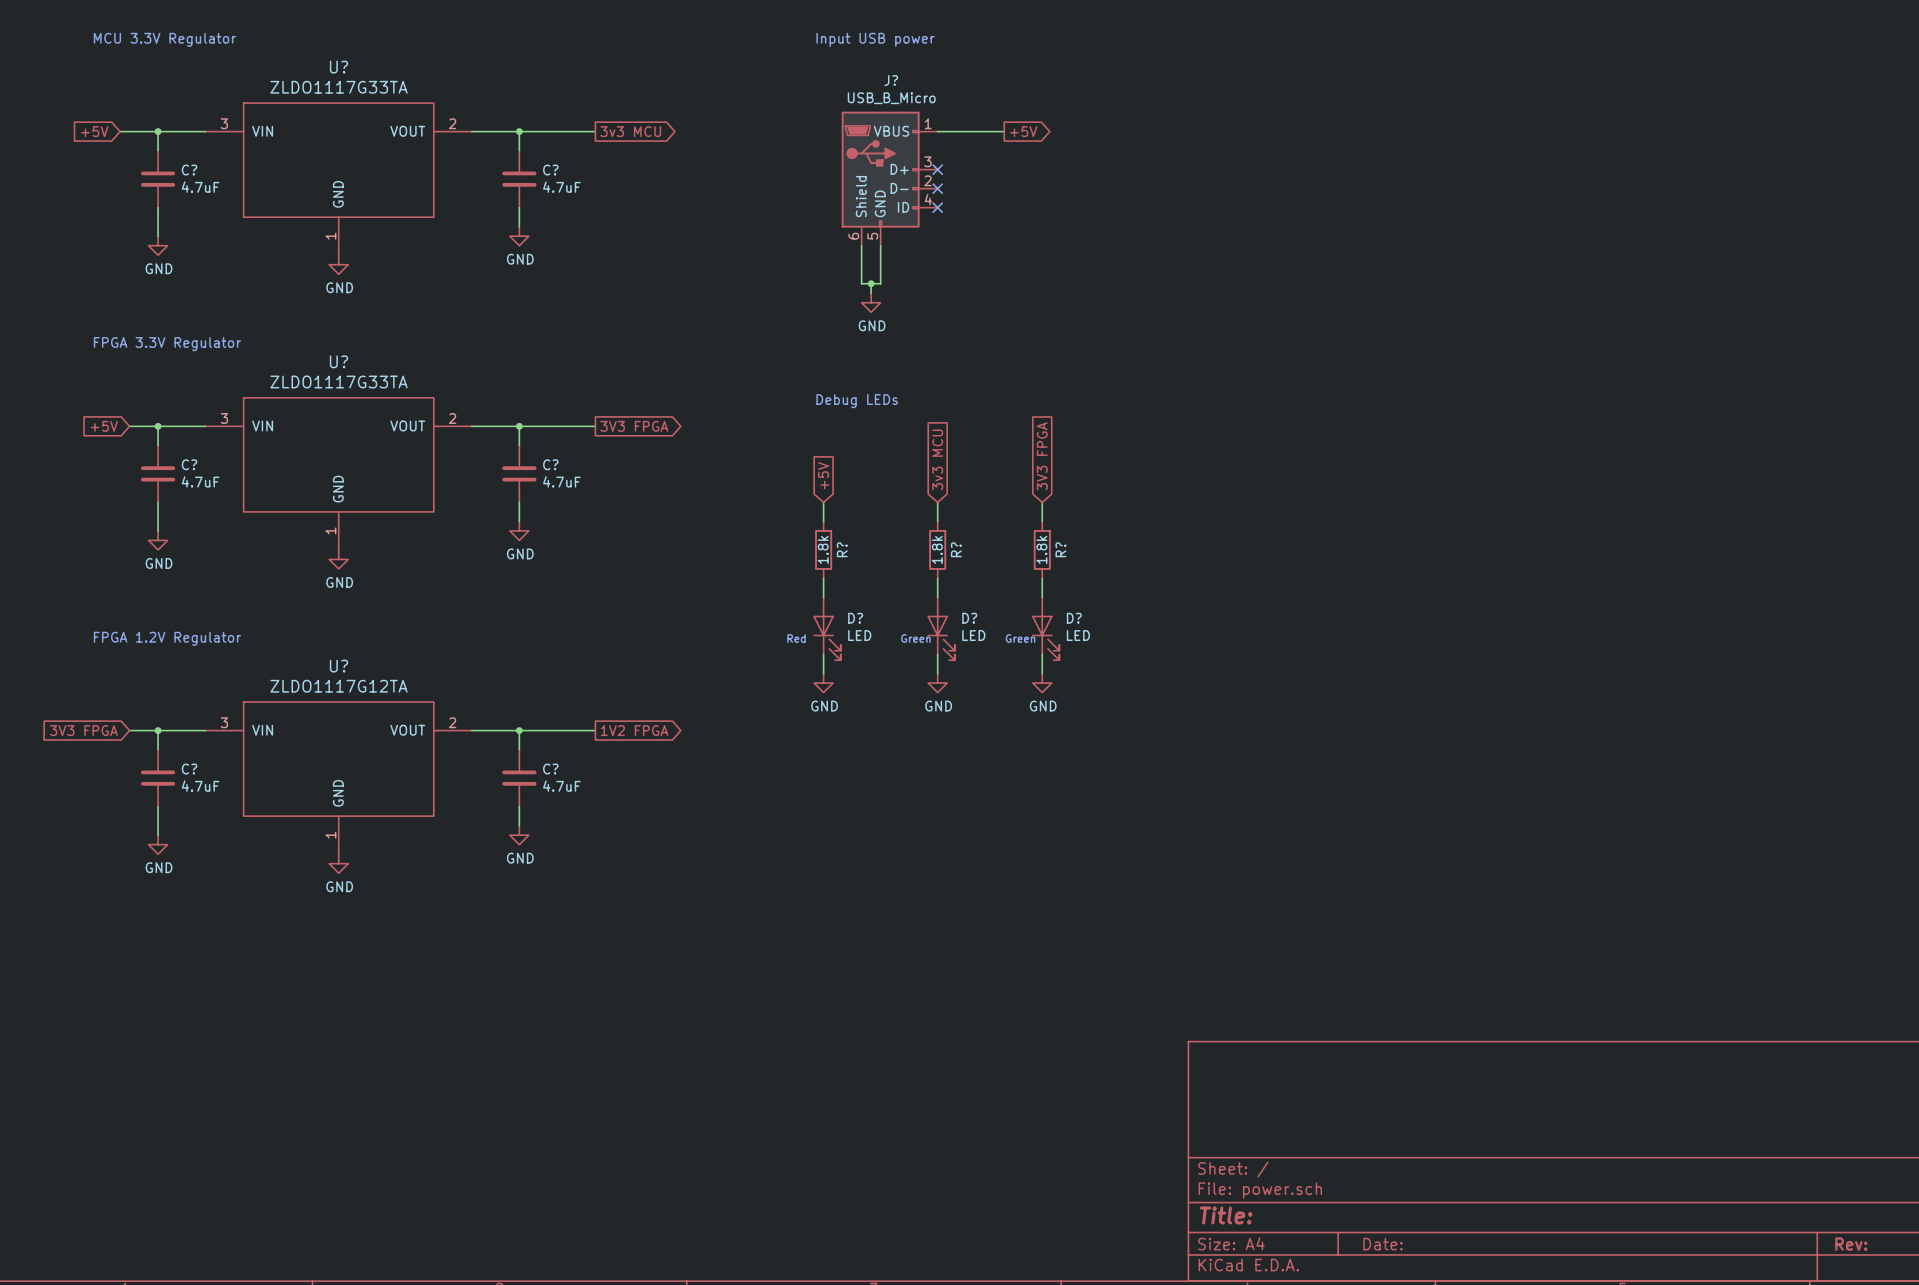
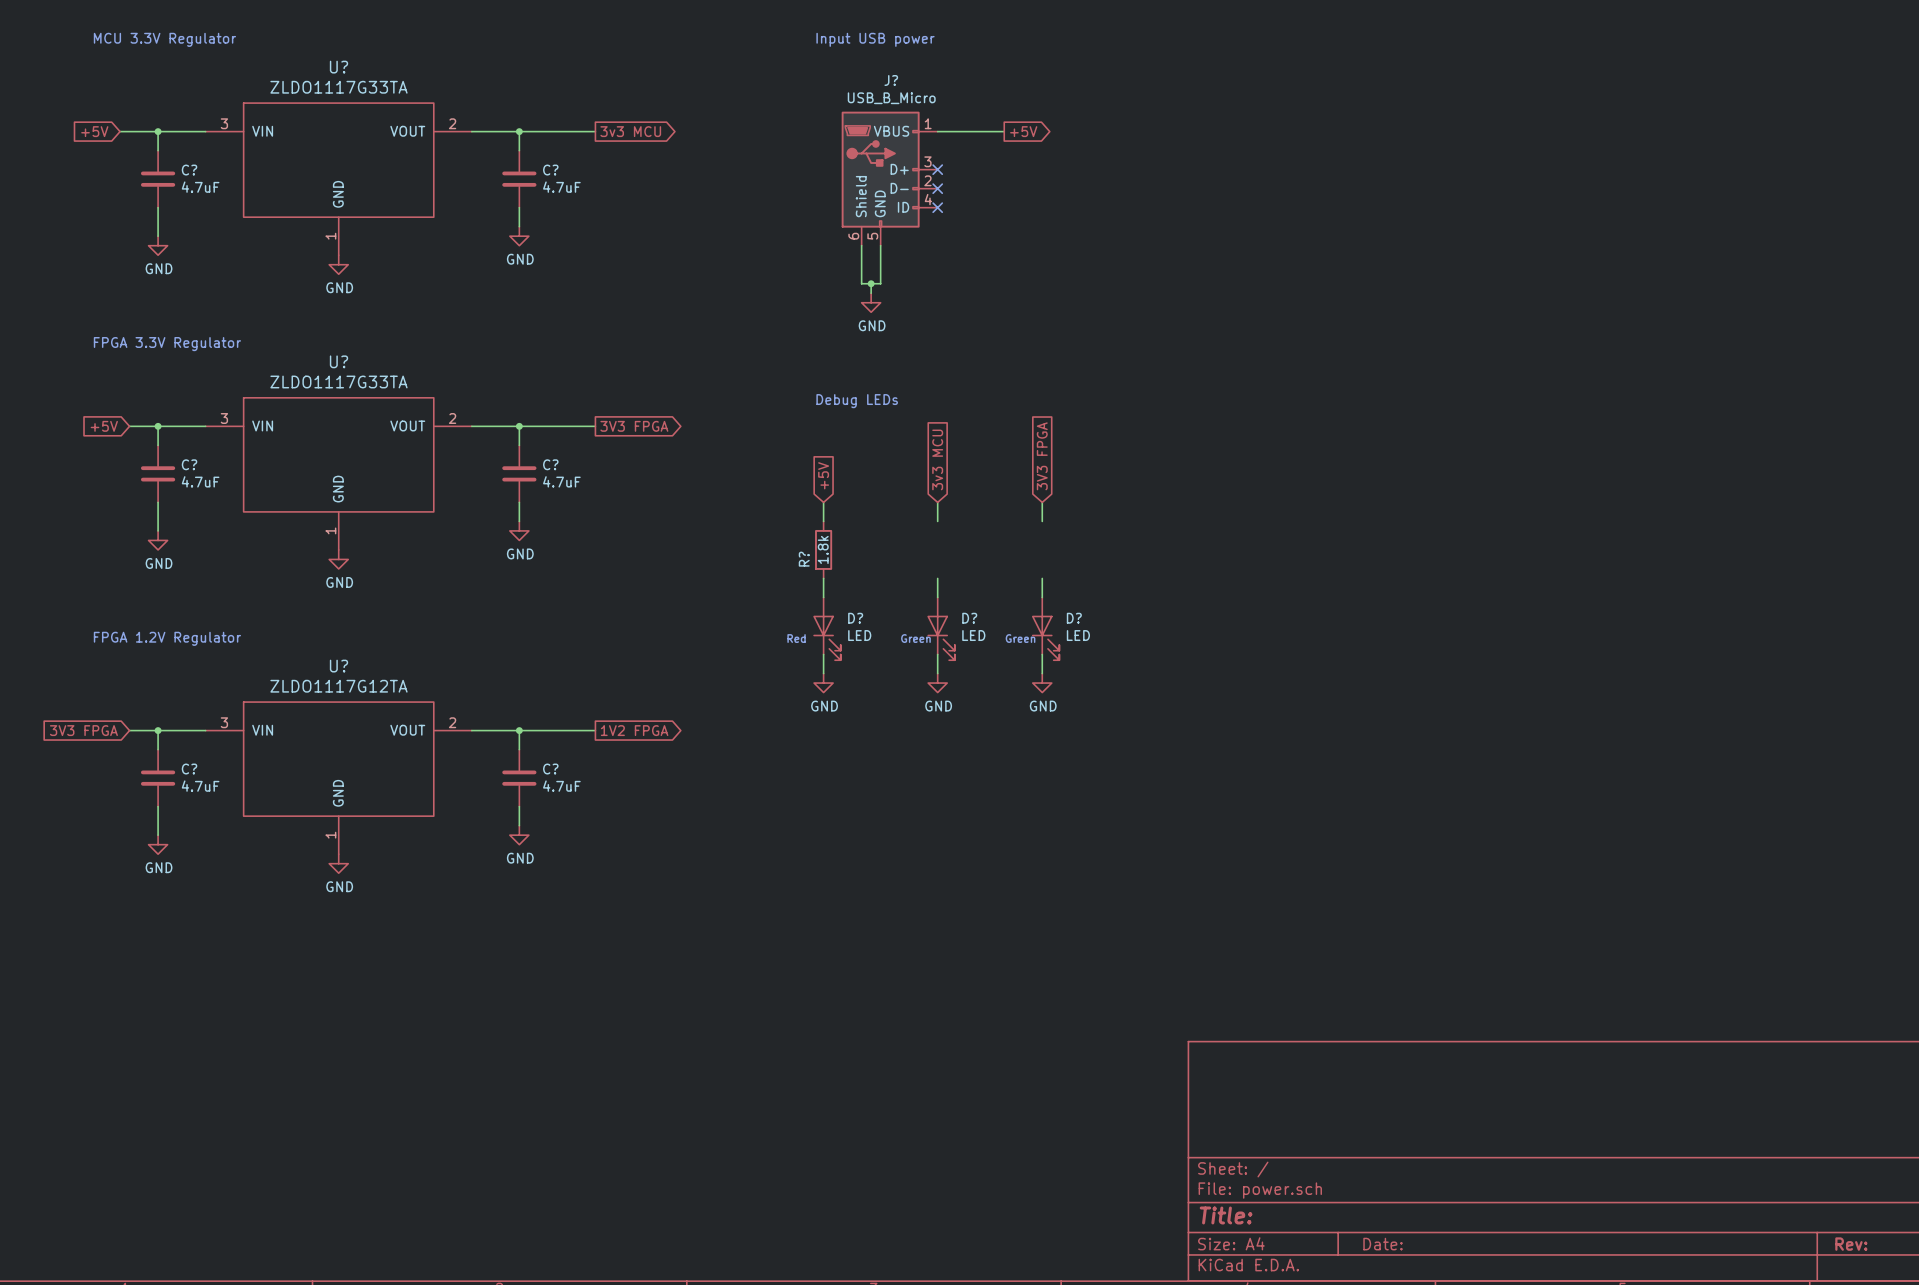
R? name position: R? (842, 549) -> R? (804, 559)
R?: 1.8k (937, 549) -> none
R?: 1.8k (1042, 549) -> none

